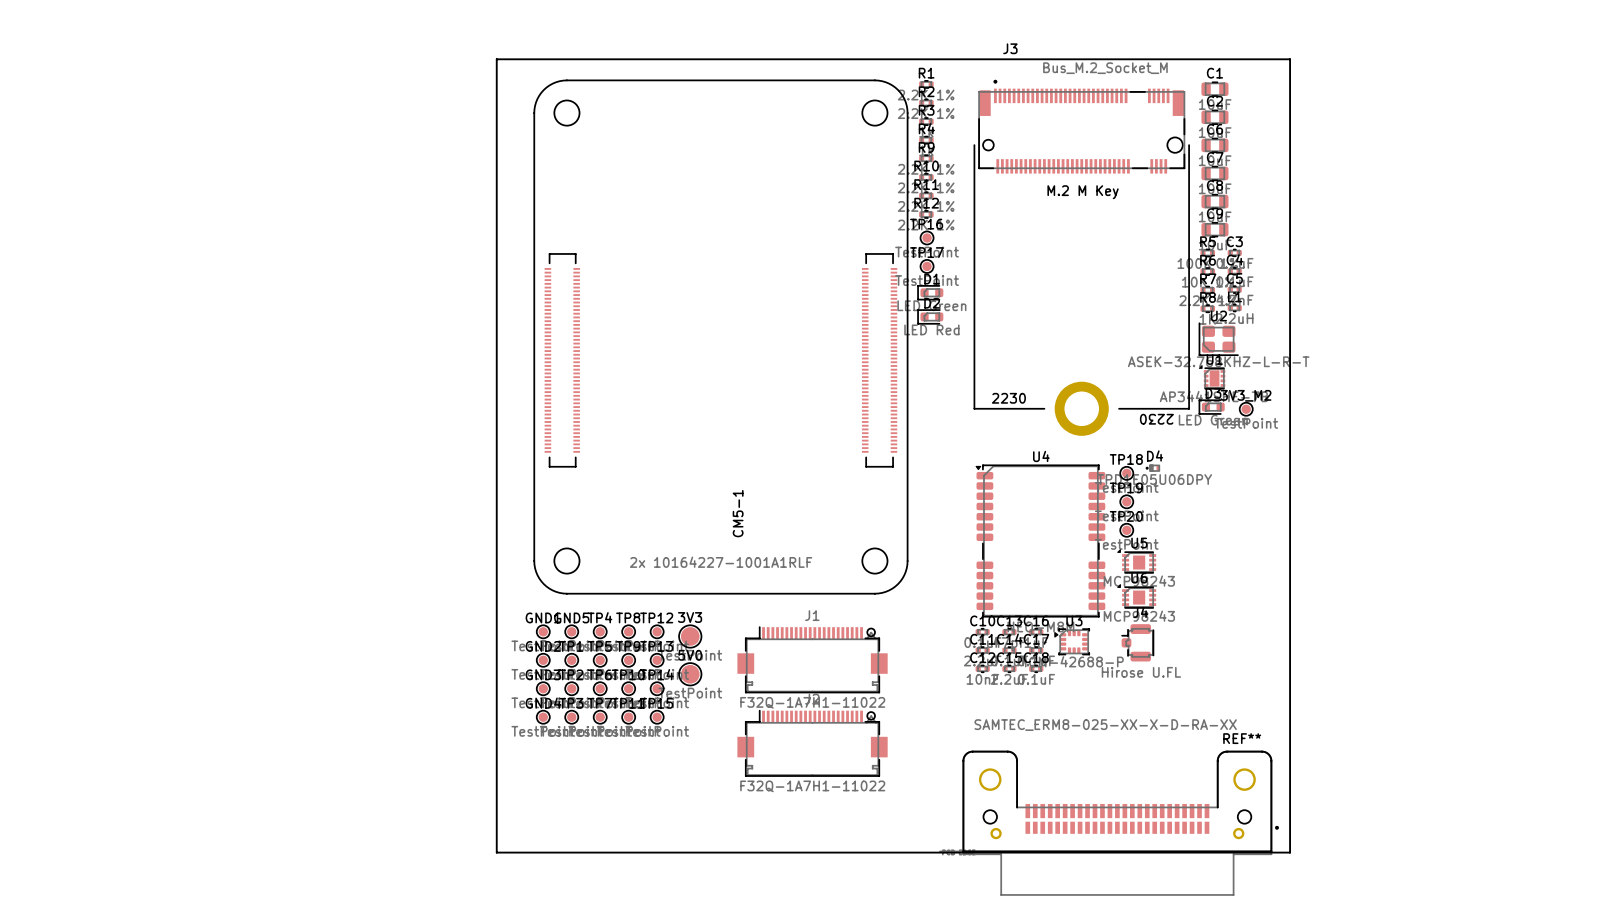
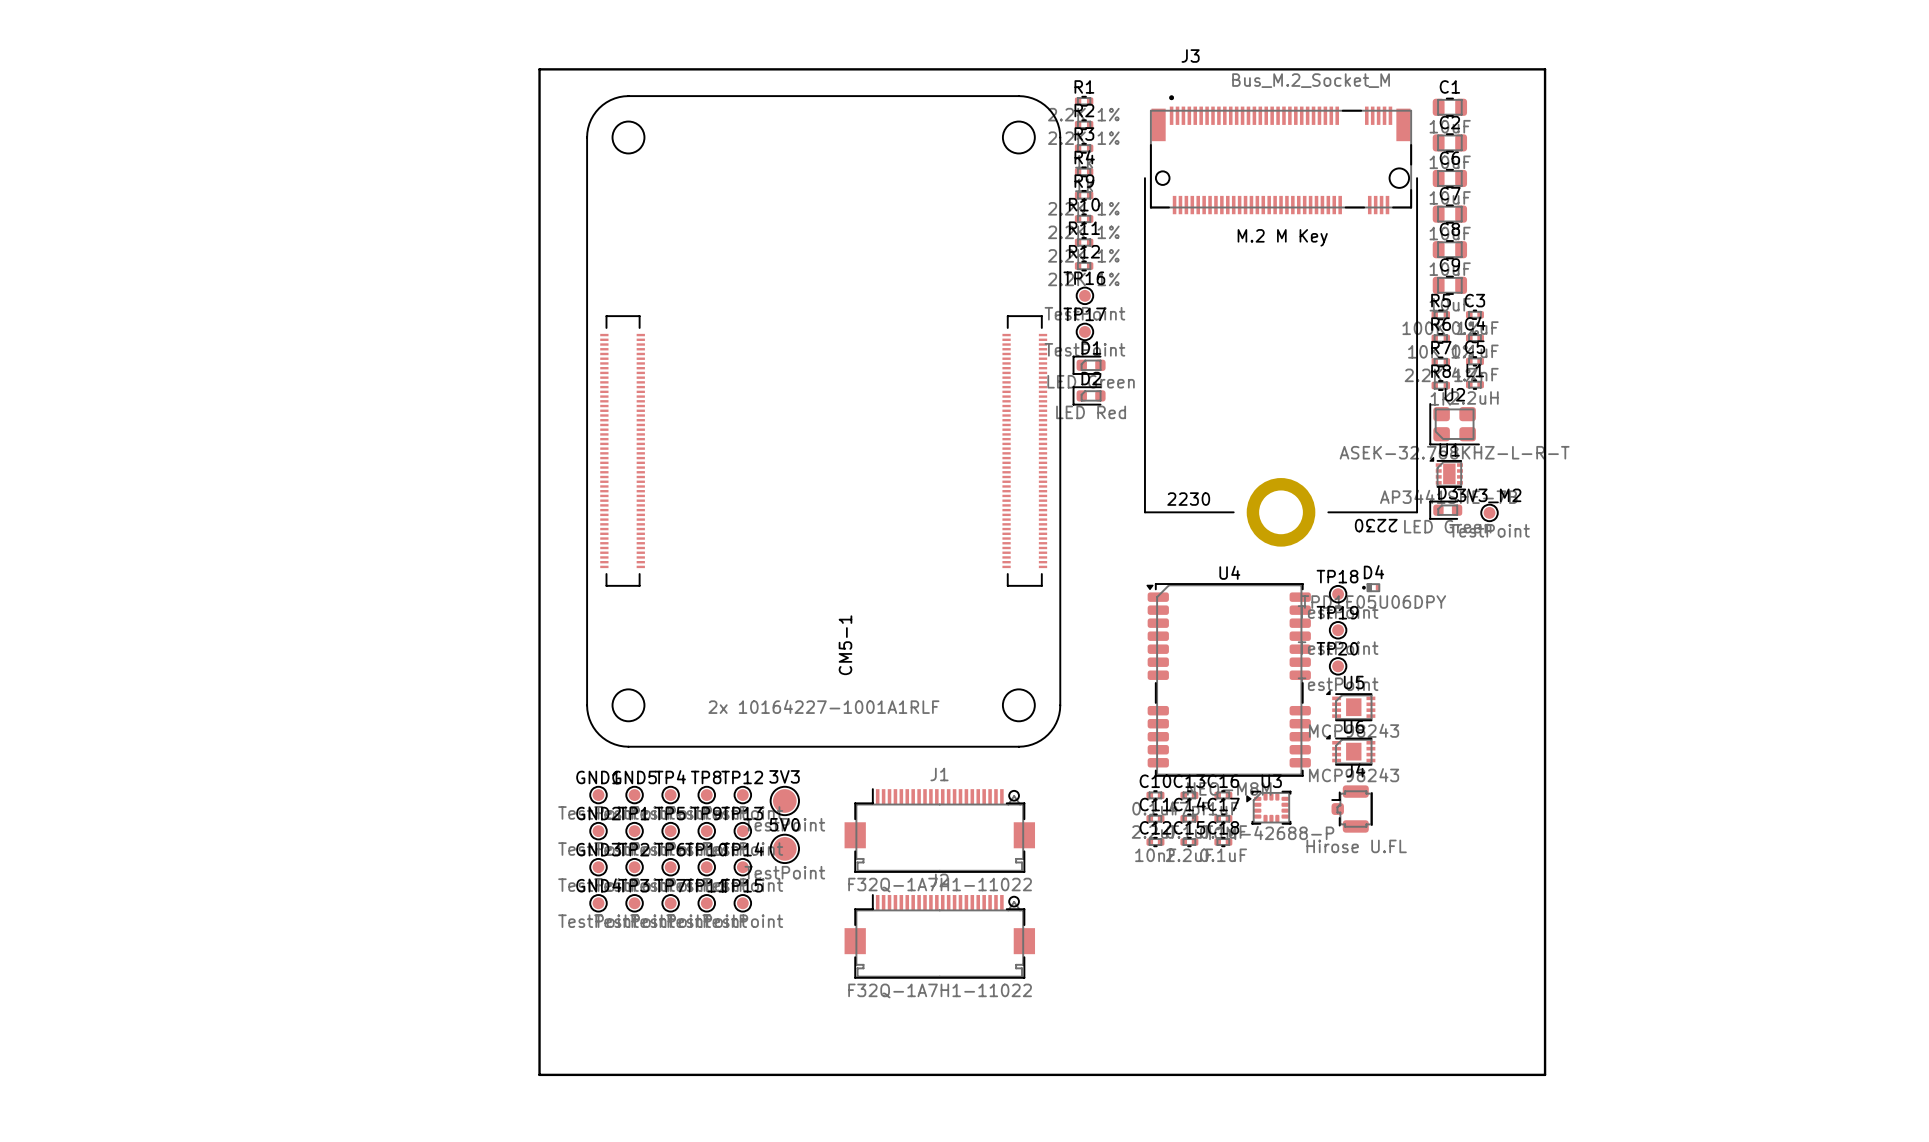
REF**: SAMTEC_ERM8-025-XX-X-D-RA-XX (1109, 823) -> none

